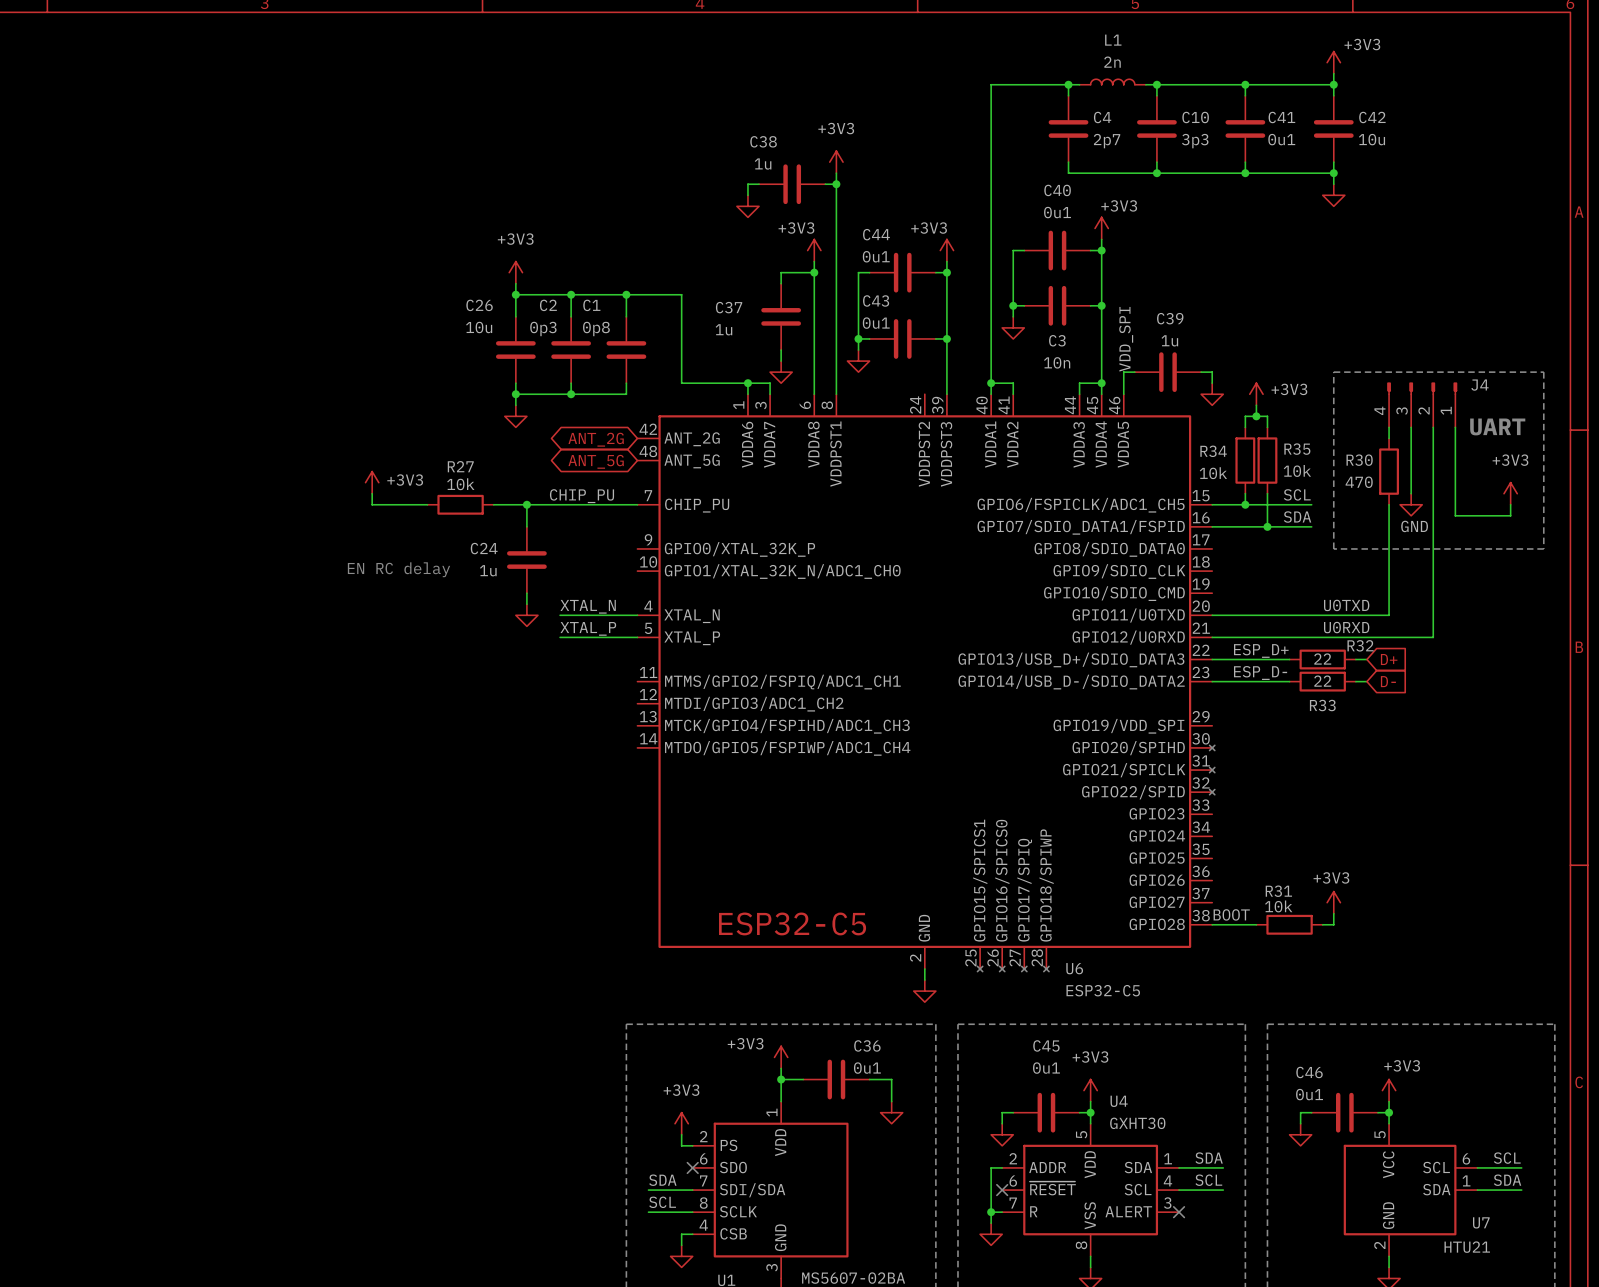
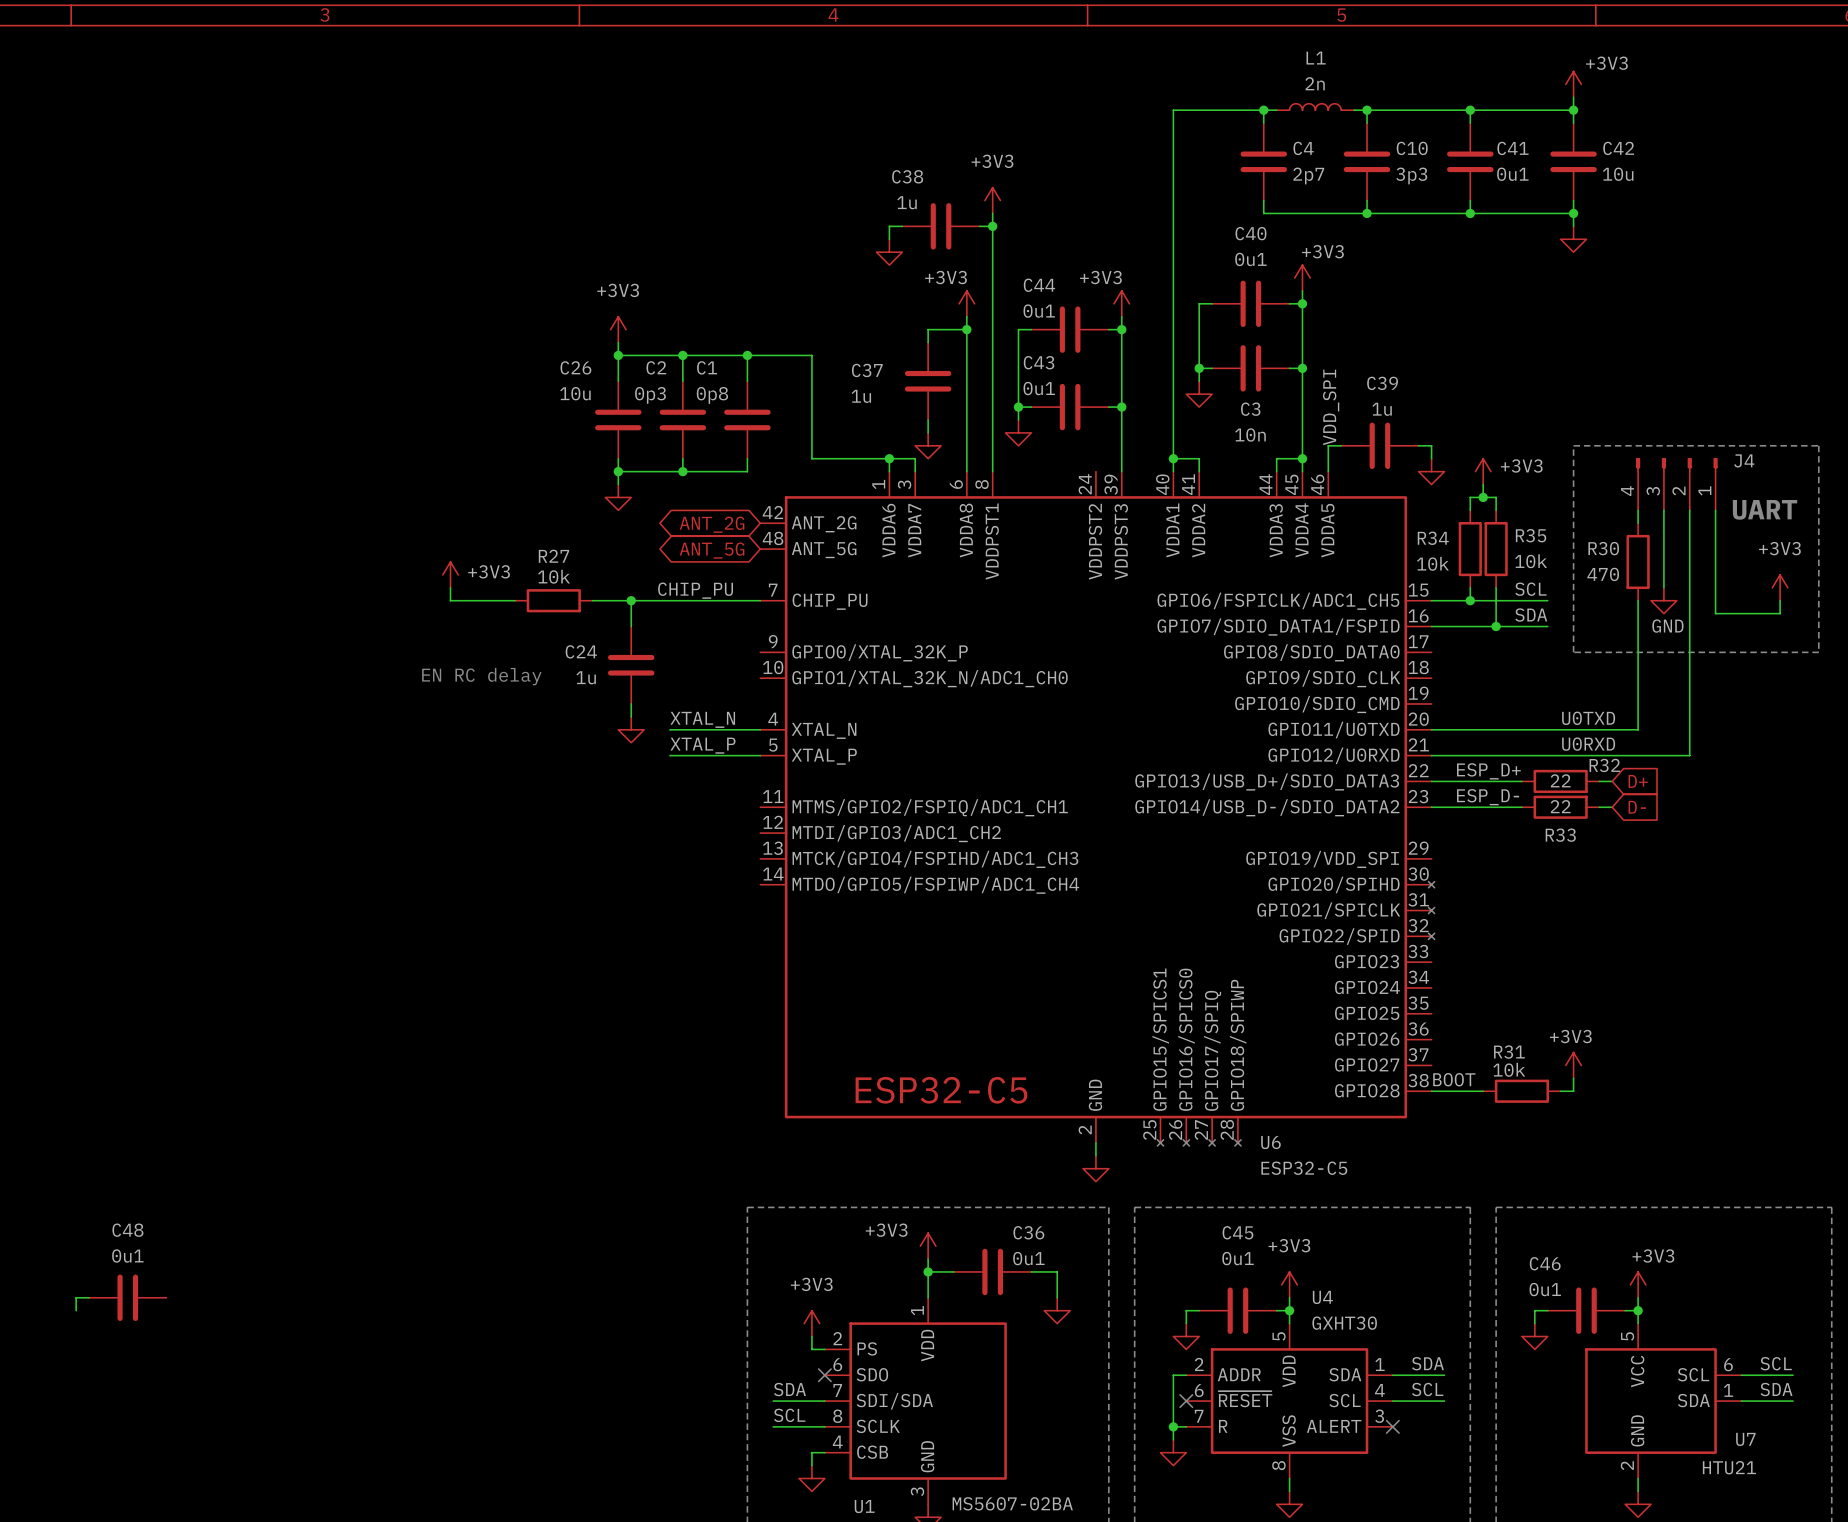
wire: none -> (89, 1297) (76, 1297) (76, 1310)
C48: none -> 0u1 (127, 1297)

